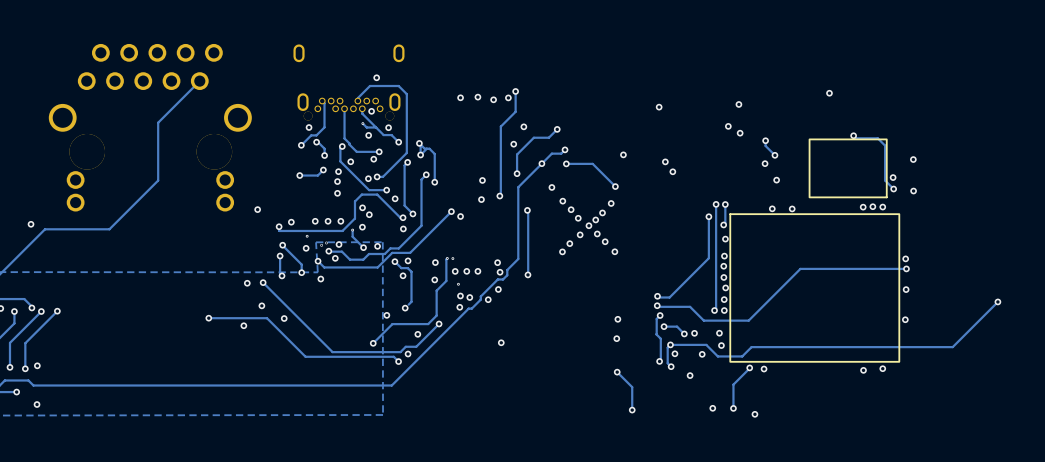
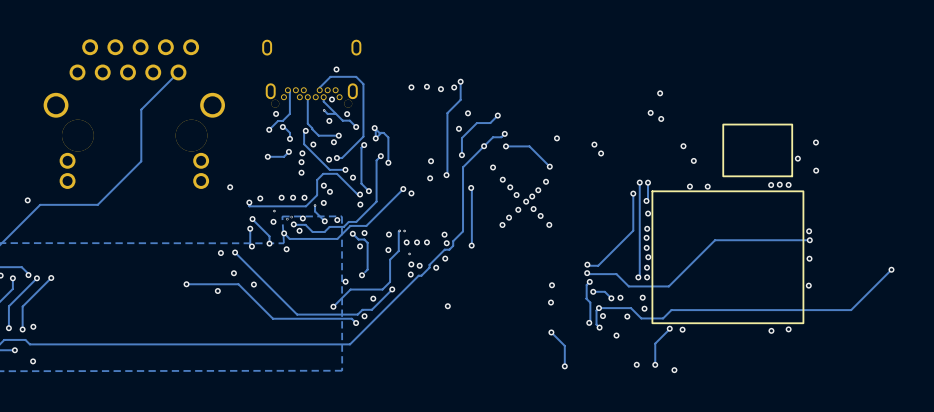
via: (829, 93) -> none
via: (659, 107) -> none
track: (853, 135) (856, 138) (877, 138) (885, 145) (885, 180) (893, 189) -> none
via: (853, 135) -> none
track: (765, 140) (765, 145) (774, 155) -> none
via: (765, 140) -> none
via: (774, 155) -> none
via: (893, 189) -> none

